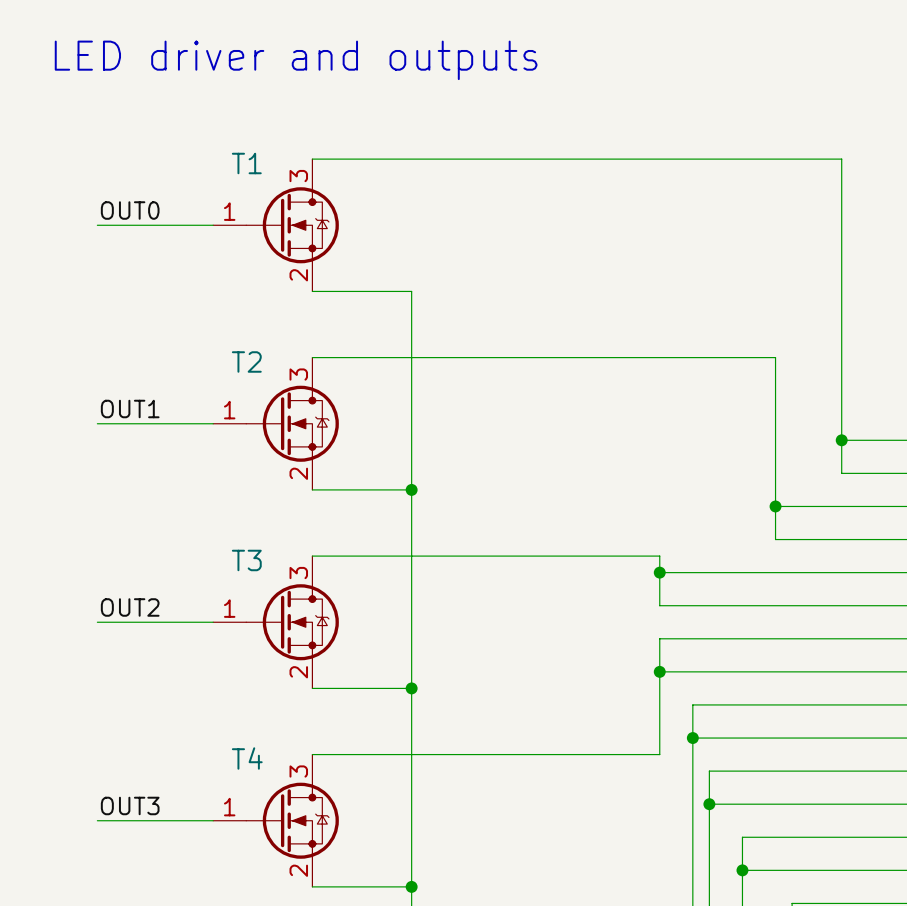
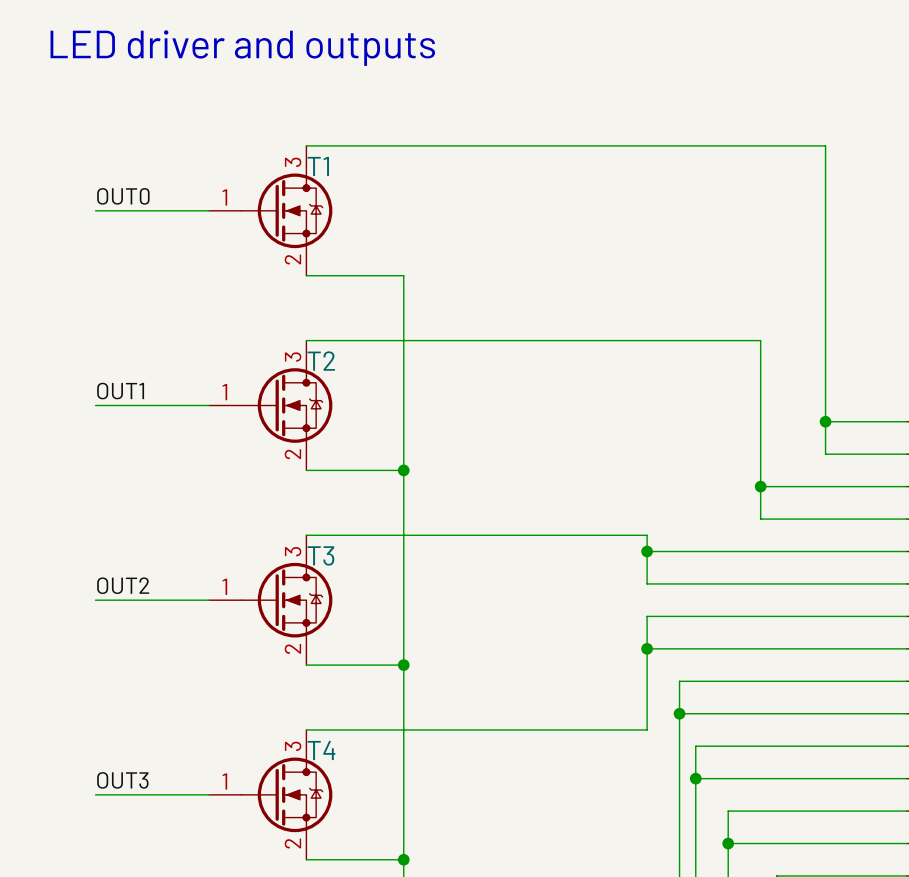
T1 name position: T1 (246, 163) -> T1 (318, 166)
T2 name position: T2 (246, 361) -> T2 (321, 361)
T3 name position: T3 (246, 560) -> T3 (320, 555)
T4 name position: T4 (247, 758) -> T4 (321, 750)

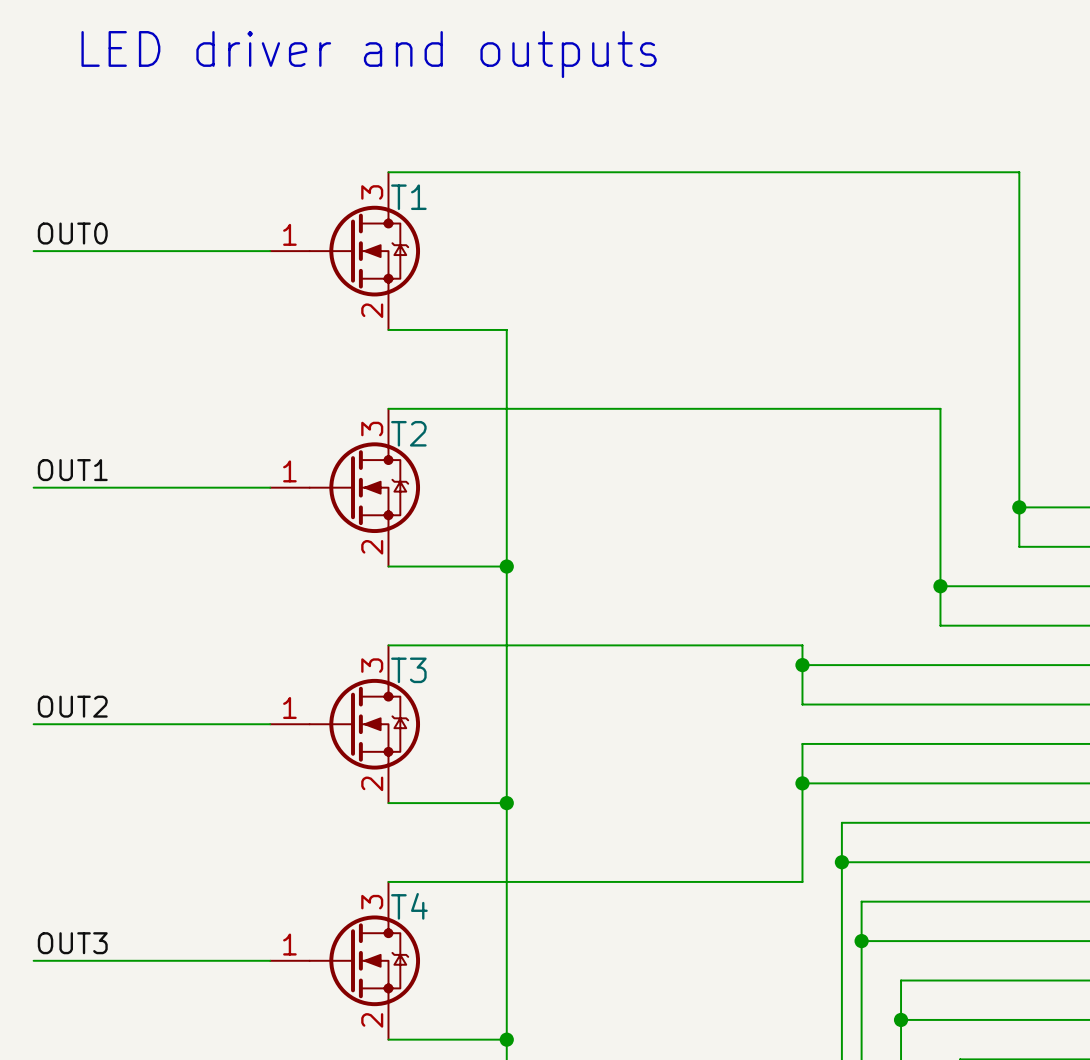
label position: OUT0 (123, 196) -> OUT0 (72, 233)
wire: none -> (33, 251) (132, 251)
label position: OUT1 (120, 391) -> OUT1 (72, 470)
wire: none -> (33, 487) (132, 487)
label position: OUT2 (123, 585) -> OUT2 (72, 706)
wire: none -> (33, 724) (132, 724)
label position: OUT3 (122, 780) -> OUT3 (72, 943)
wire: none -> (33, 960) (132, 960)

